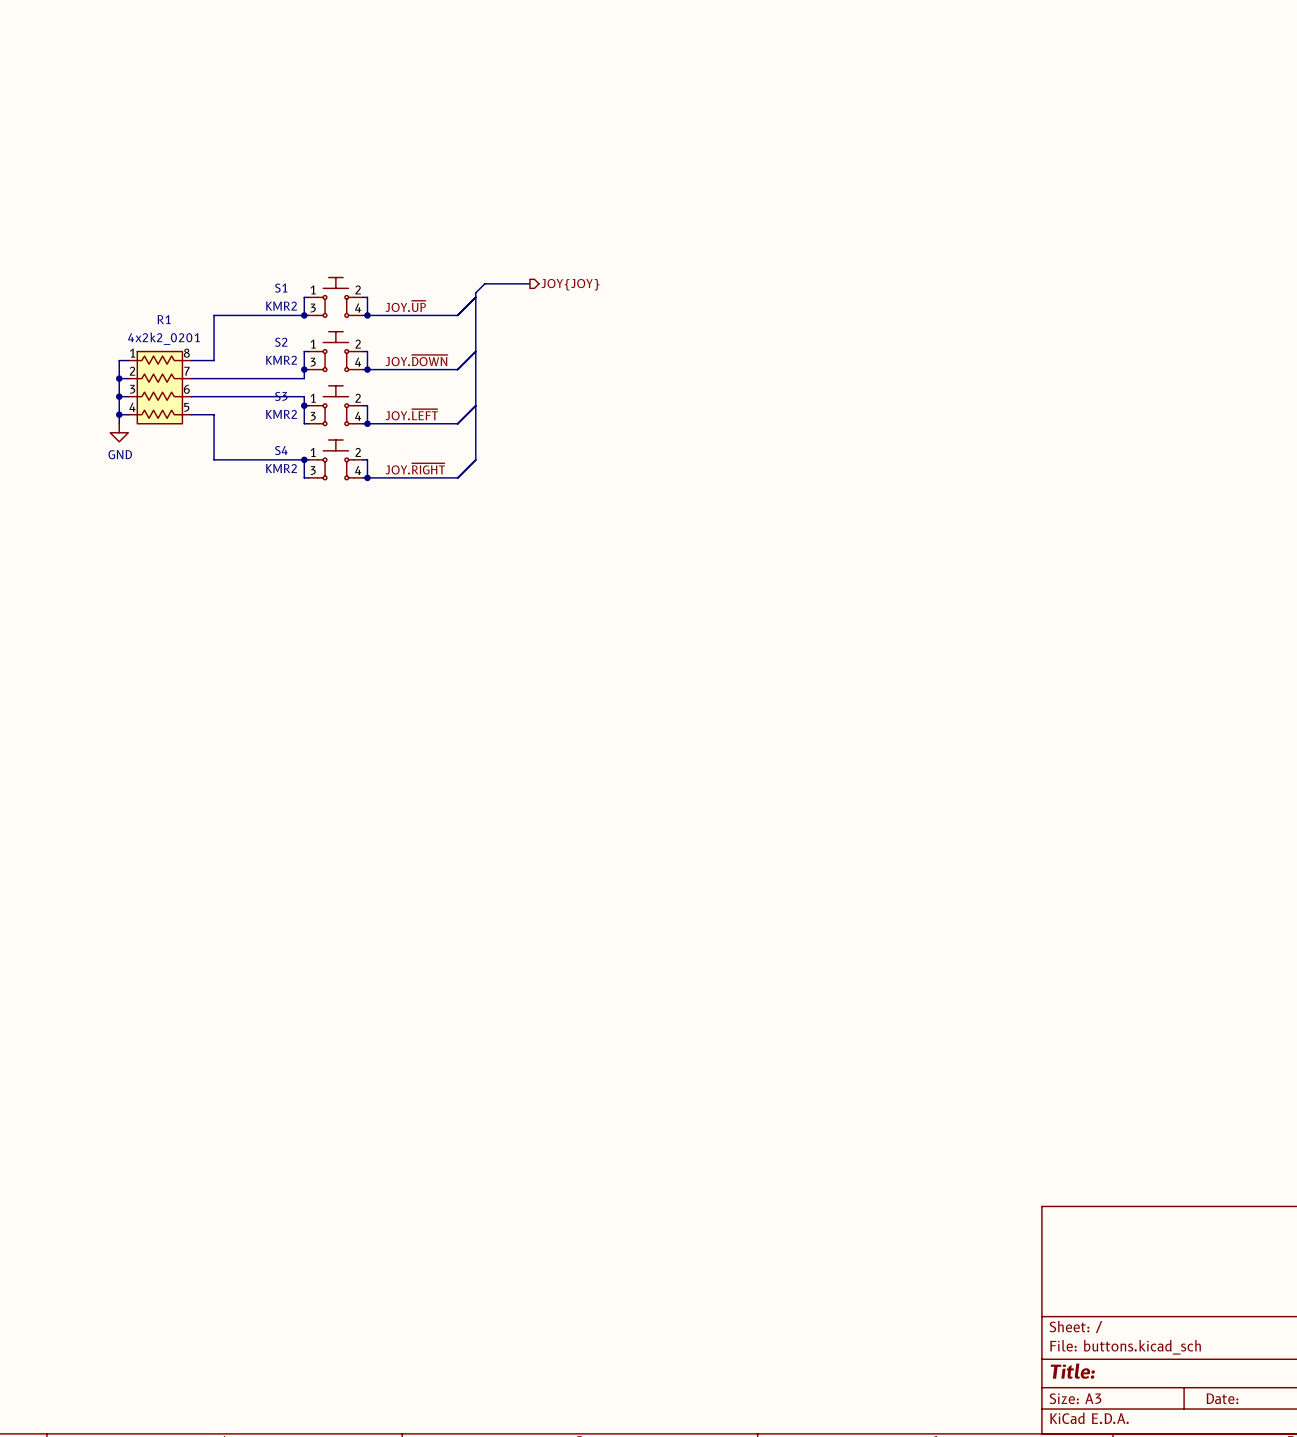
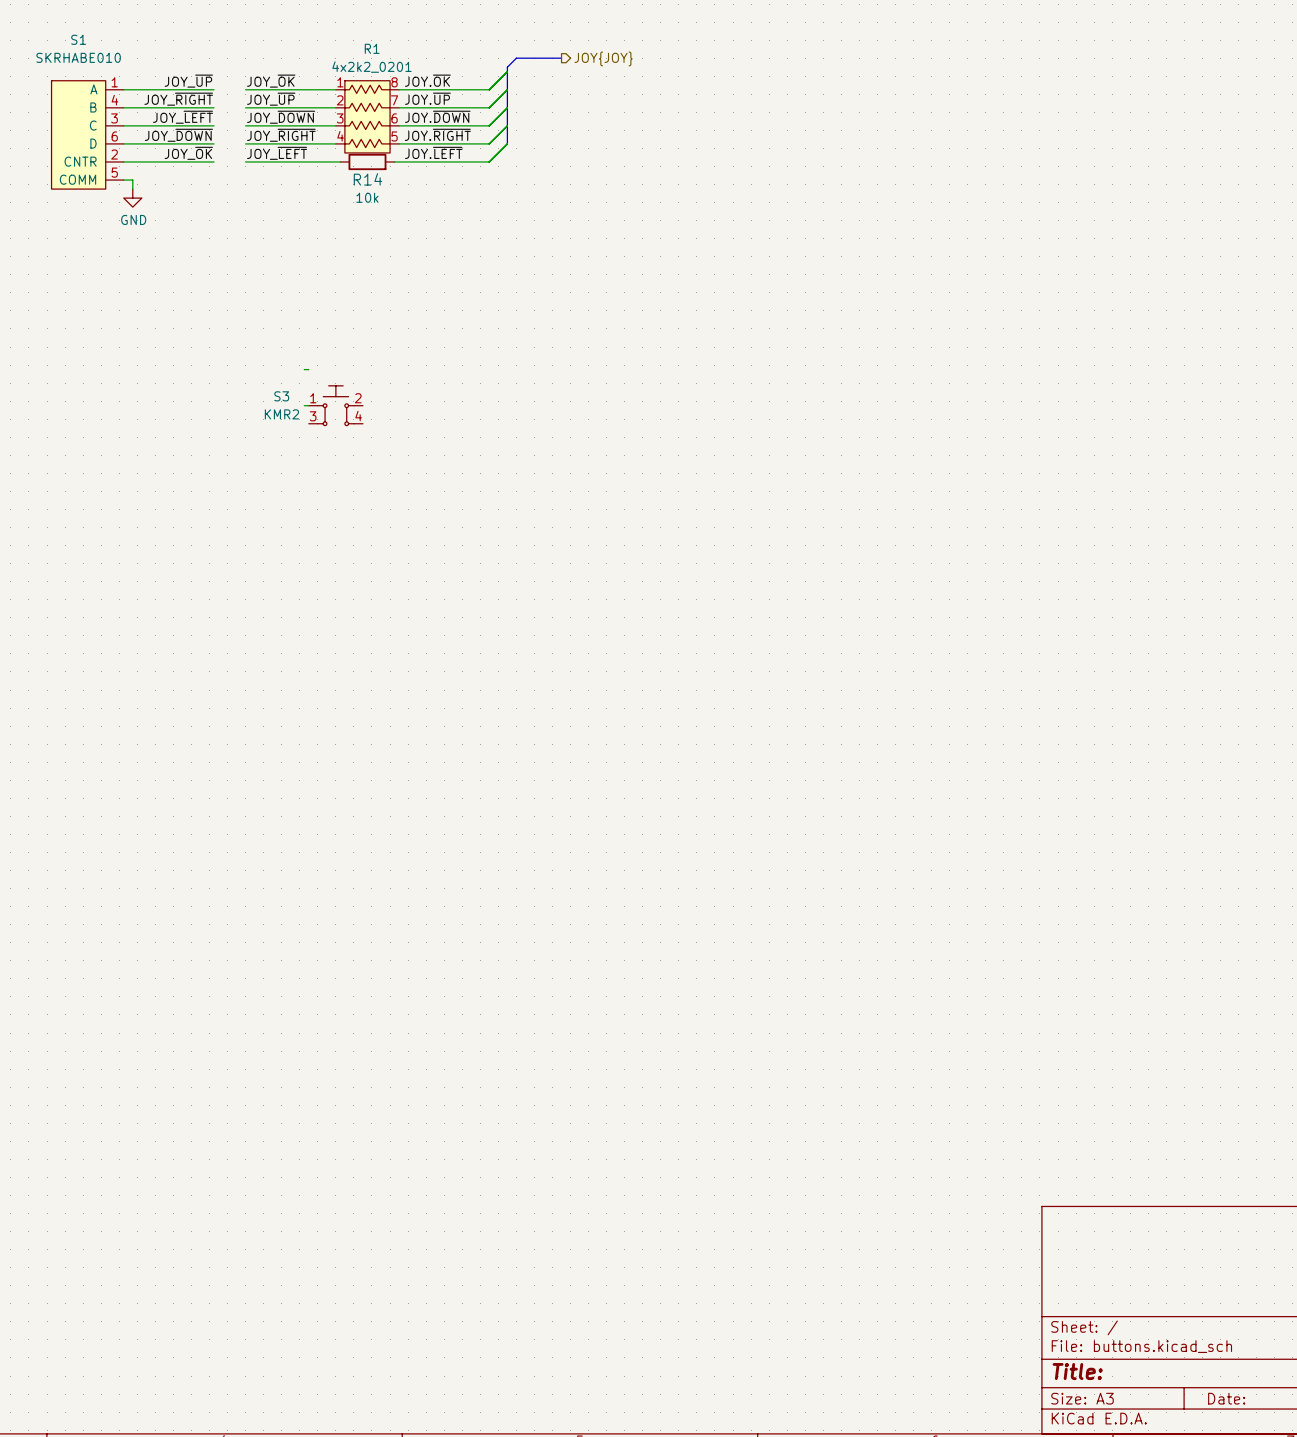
bus: none -> (561, 58) (516, 58) (507, 67) (507, 143)
hierarchical label: none -> JOY{JOY} (603, 58)
wire: none -> (507, 71) (489, 89) (399, 89)
label: none -> JOY.~{OK} (427, 80)
label: none -> JOY_~{UP} (188, 81)
label: none -> JOY_~{OK} (271, 81)
wire: none -> (123, 89) (214, 89)
wire: none -> (245, 89) (335, 89)
wire: none -> (507, 89) (489, 107)
label: none -> JOY.~{UP} (427, 98)
label: none -> JOY_~{RIGHT} (178, 99)
label: none -> JOY_~{UP} (271, 99)
wire: none -> (123, 107) (214, 107)
wire: none -> (245, 107) (335, 107)
wire: none -> (399, 107) (489, 107)
wire: none -> (507, 107) (489, 125) (399, 125)
label: none -> JOY.~{DOWN} (437, 116)
label: none -> JOY_~{LEFT} (183, 117)
label: none -> JOY_~{DOWN} (281, 117)
wire: none -> (123, 125) (214, 125)
wire: none -> (245, 125) (335, 125)
wire: none -> (507, 125) (489, 143)
label: none -> JOY.~{RIGHT} (437, 134)
label: none -> JOY_~{DOWN} (178, 135)
label: none -> JOY_~{RIGHT} (281, 135)
wire: none -> (123, 143) (214, 143)
wire: none -> (245, 143) (335, 143)
wire: none -> (399, 143) (489, 143)
label: none -> JOY.~{LEFT} (433, 152)
label: none -> JOY_~{OK} (188, 153)
label: none -> JOY_~{LEFT} (277, 153)
wire: none -> (123, 161) (214, 161)
wire: none -> (245, 161) (340, 161)
R14: none -> (367, 161)
wire: none -> (123, 180) (132, 180) (132, 189)
power symbol: none -> GND (132, 198)
S1 symbol: [308, 277, 363, 318] -> [51, 80, 124, 190]
bus: (529, 283) (484, 283) (475, 292) (475, 459) -> none
hierarchical label: JOY{JOY} (570, 284) -> none
S1 name position: S1 (281, 288) -> S1 (78, 39)
wire: (308, 297) (304, 297) (304, 315) -> none
wire: (362, 297) (367, 297) (367, 315) -> none
wire: (475, 297) (457, 315) (362, 315) -> (507, 143) (489, 161) (394, 161)
S1 value: KMR2 (281, 306) -> SKRHABE010 (78, 57)
label: JOY.~{UP} (405, 306) -> none
junction: (304, 315) -> none
wire: (308, 315) (214, 315) (214, 360) (191, 360) -> none
junction: (367, 315) -> none
wire: (308, 351) (304, 351) (304, 378) (191, 378) -> none
S2: KMR2 (335, 351) -> none
wire: (362, 351) (367, 351) (367, 369) -> none
wire: (475, 351) (457, 369) (362, 369) -> none
wire: (128, 360) (119, 360) (119, 423) -> none
label: JOY.~{DOWN} (416, 360) -> none
junction: (304, 369) -> none
junction: (367, 369) -> none
wire: (119, 378) (128, 378) -> none
junction: (119, 378) -> none
R1 position: (159, 387) -> (367, 116)
wire: (119, 396) (128, 396) -> none
junction: (119, 396) -> none
wire: (191, 396) (304, 396) (304, 423) (308, 423) -> none
junction: (304, 405) -> none
wire: (362, 405) (367, 405) (367, 423) -> none
wire: (475, 405) (457, 423) (362, 423) -> none
wire: (119, 414) (128, 414) -> none
junction: (119, 414) -> none
wire: (191, 414) (214, 414) (214, 459) (308, 459) -> none
label: JOY.~{LEFT} (411, 414) -> none
junction: (367, 423) -> none
power symbol: GND (119, 432) -> none
wire: (304, 459) (304, 477) (308, 477) -> none
junction: (304, 459) -> none
S4: KMR2 (335, 459) -> none
wire: (362, 459) (367, 459) (367, 477) -> none
wire: (475, 459) (457, 477) (362, 477) -> none
label: JOY.~{RIGHT} (415, 468) -> none
junction: (367, 477) -> none

